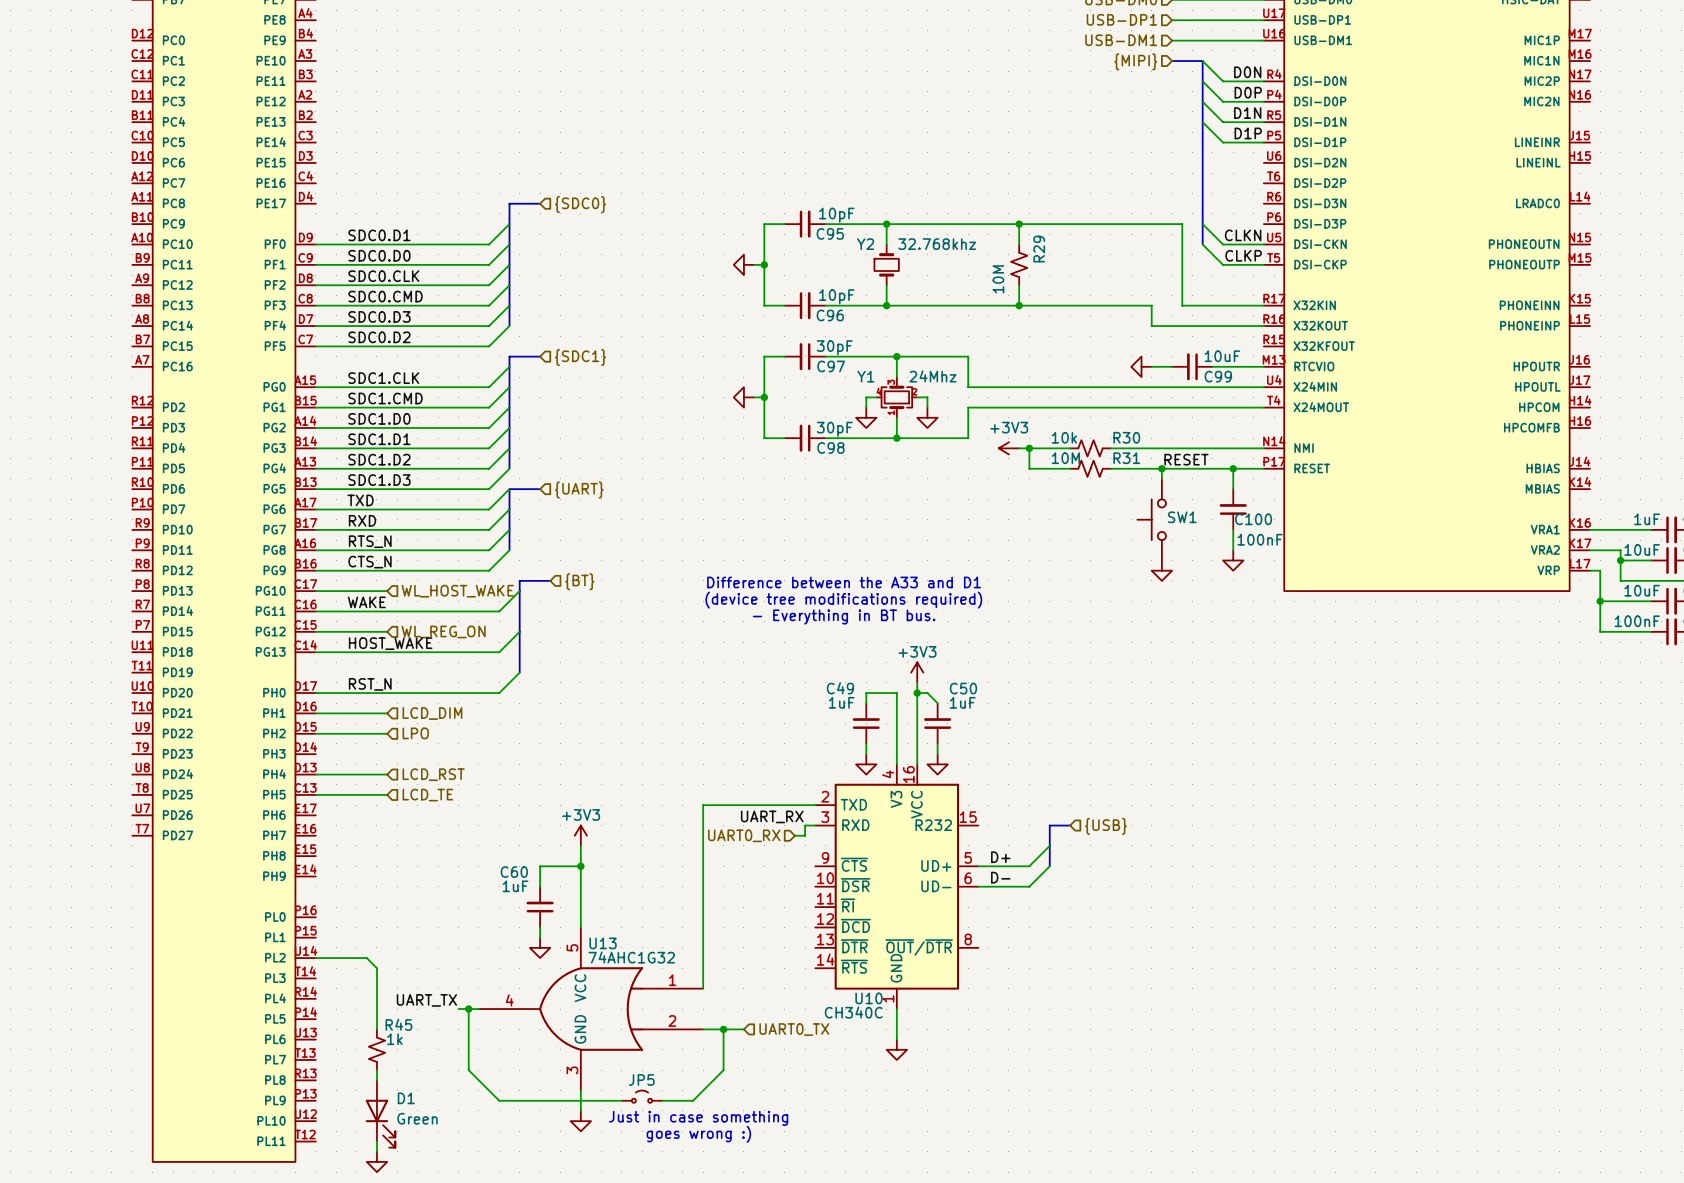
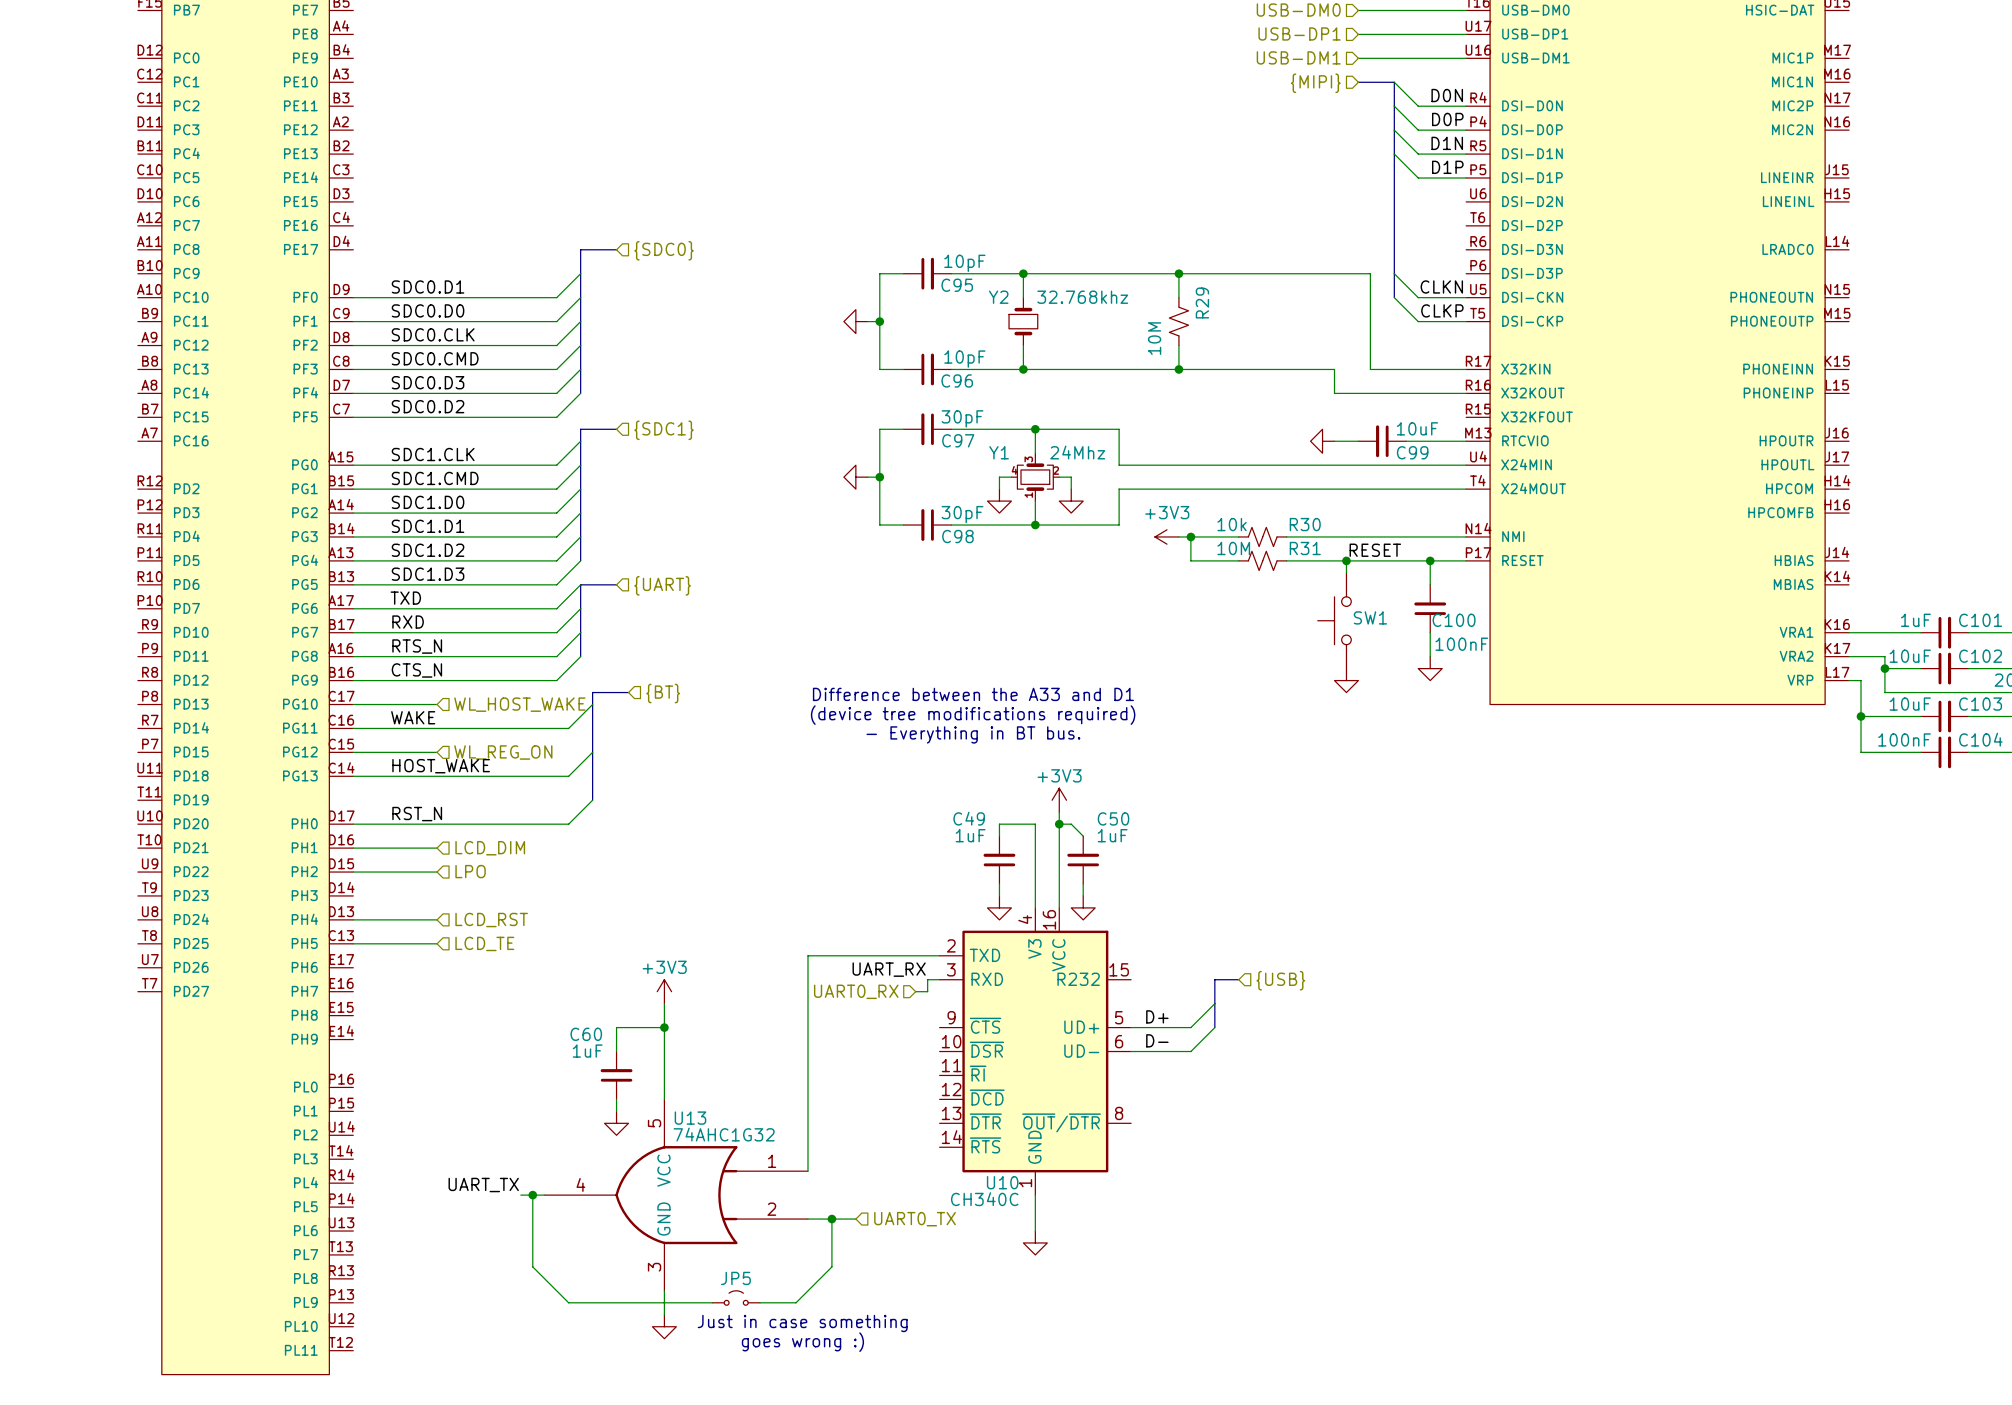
wire: (315, 958) (366, 958) (376, 968) (376, 1029) -> none
R45: 1k (376, 1049) -> none
wire: (376, 1070) (376, 1080) -> none
D1: Green (380, 1114) -> none
wire: (376, 1141) (376, 1151) -> none
power symbol: (376, 1161) -> none

